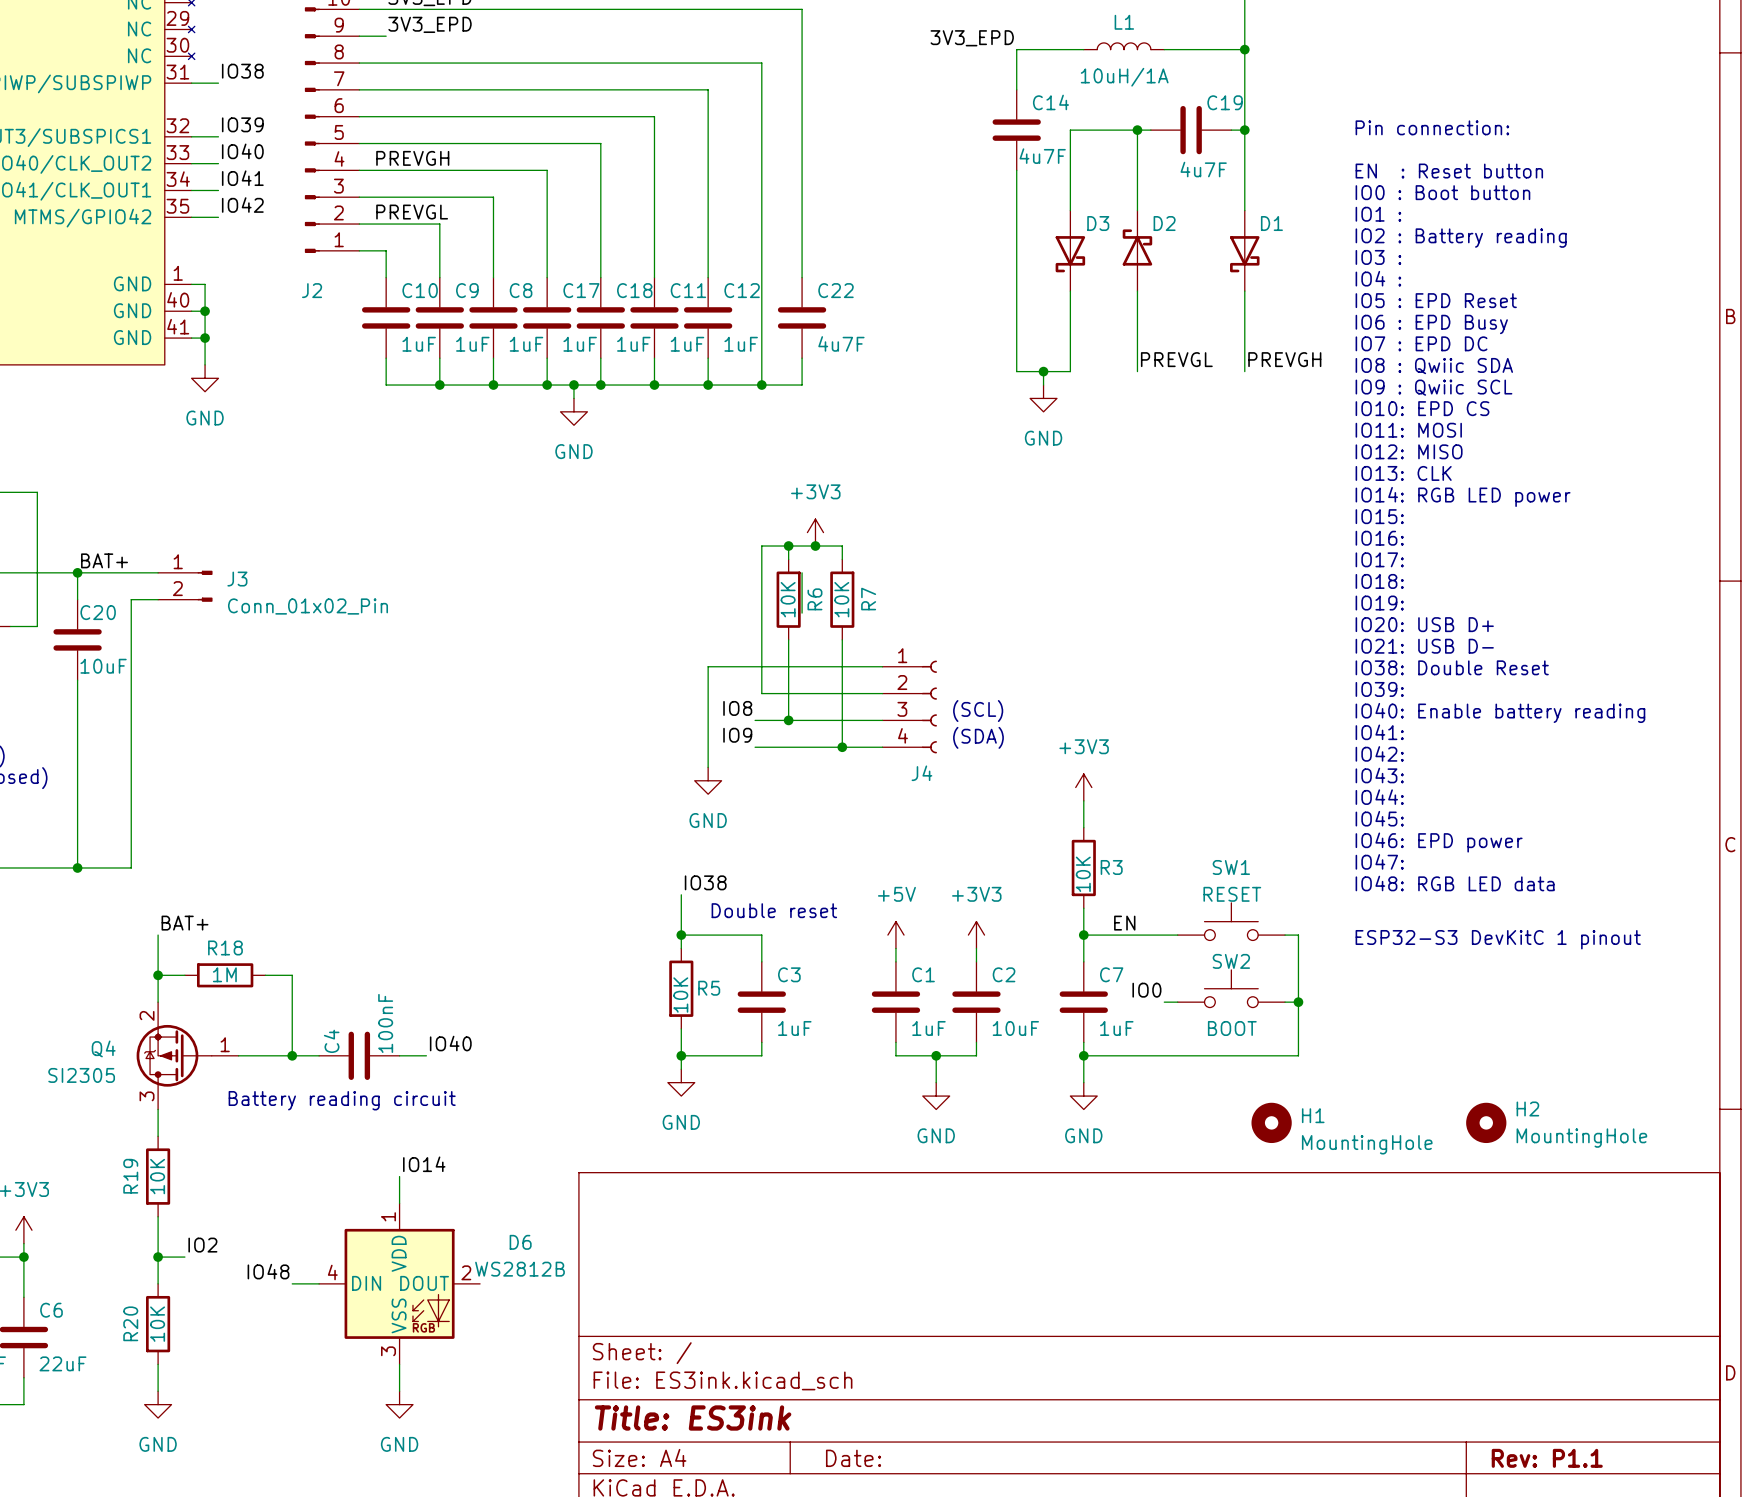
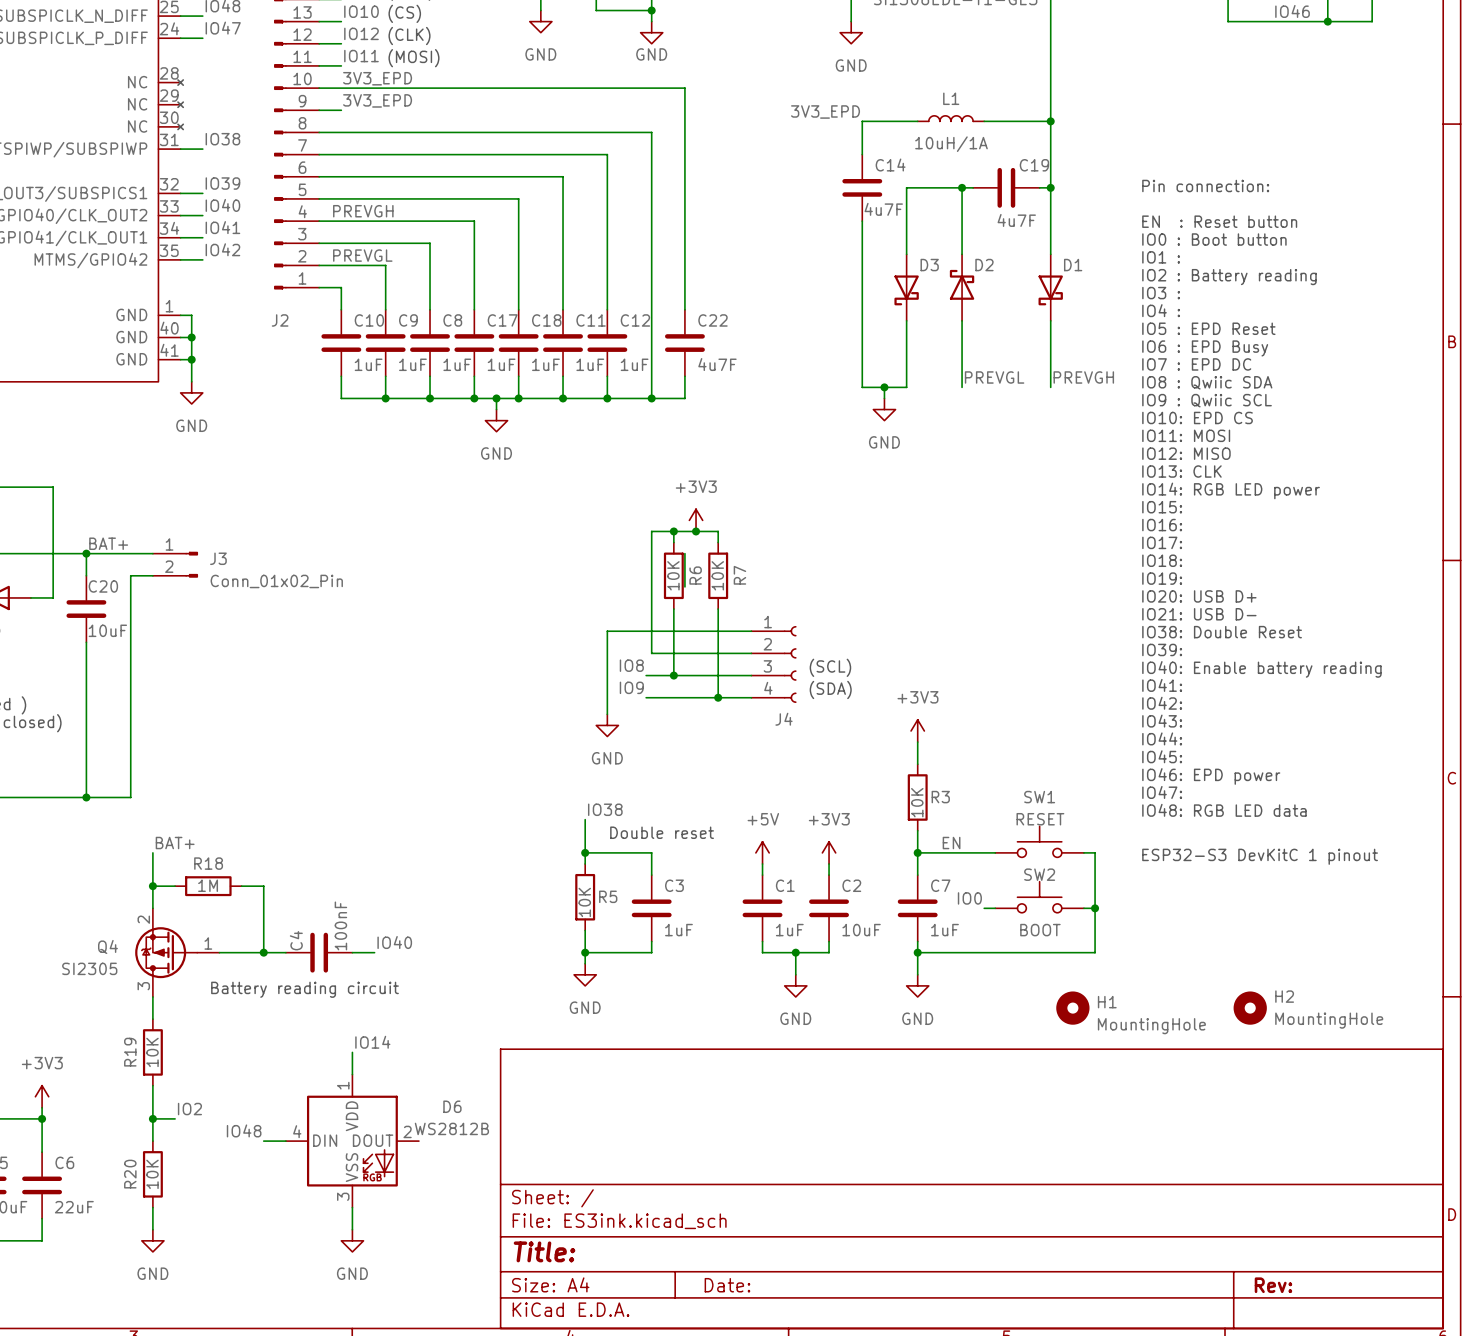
title block: Title: ES3ink (693, 1418) -> Title: (544, 1251)
title block: Rev: P1.1 (1547, 1458) -> Rev: (1273, 1285)

